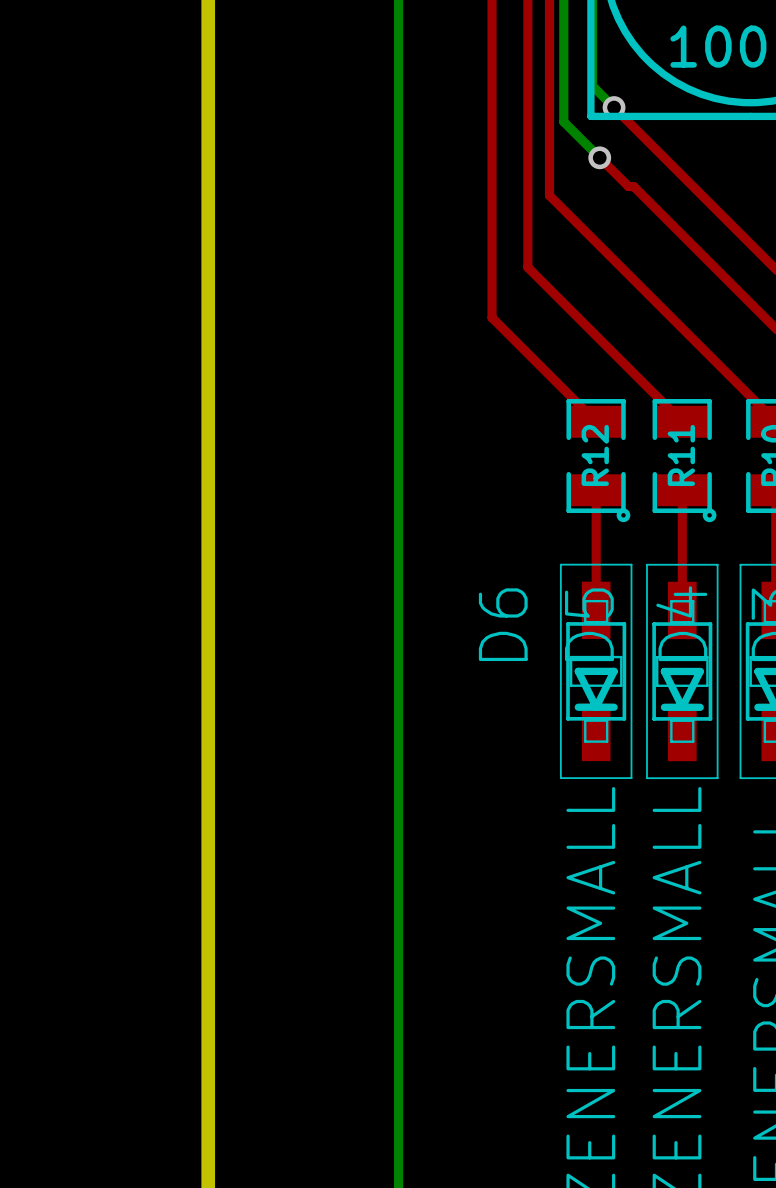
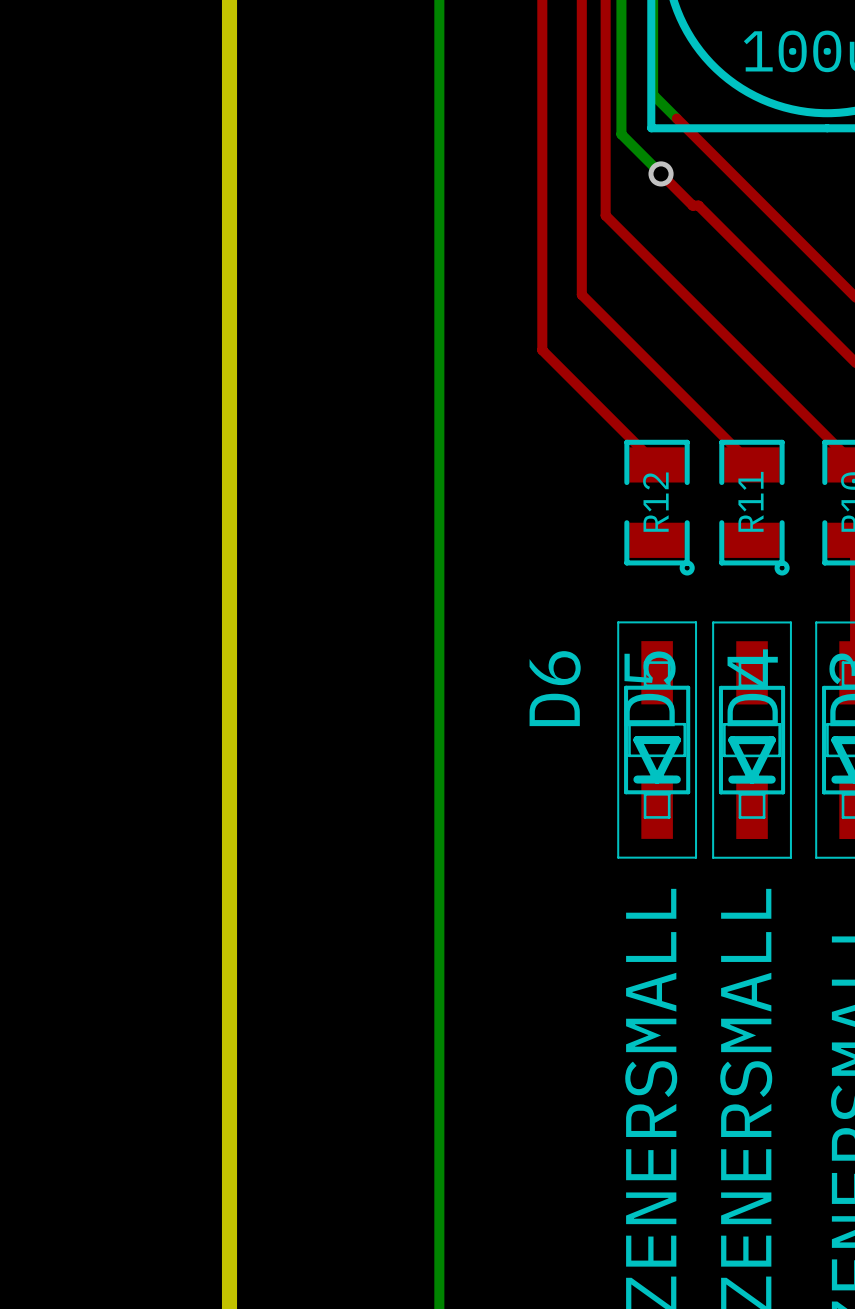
via: (614, 107) -> none
top track: (596, 490) (596, 610) -> none
top track: (682, 490) (682, 610) -> none

